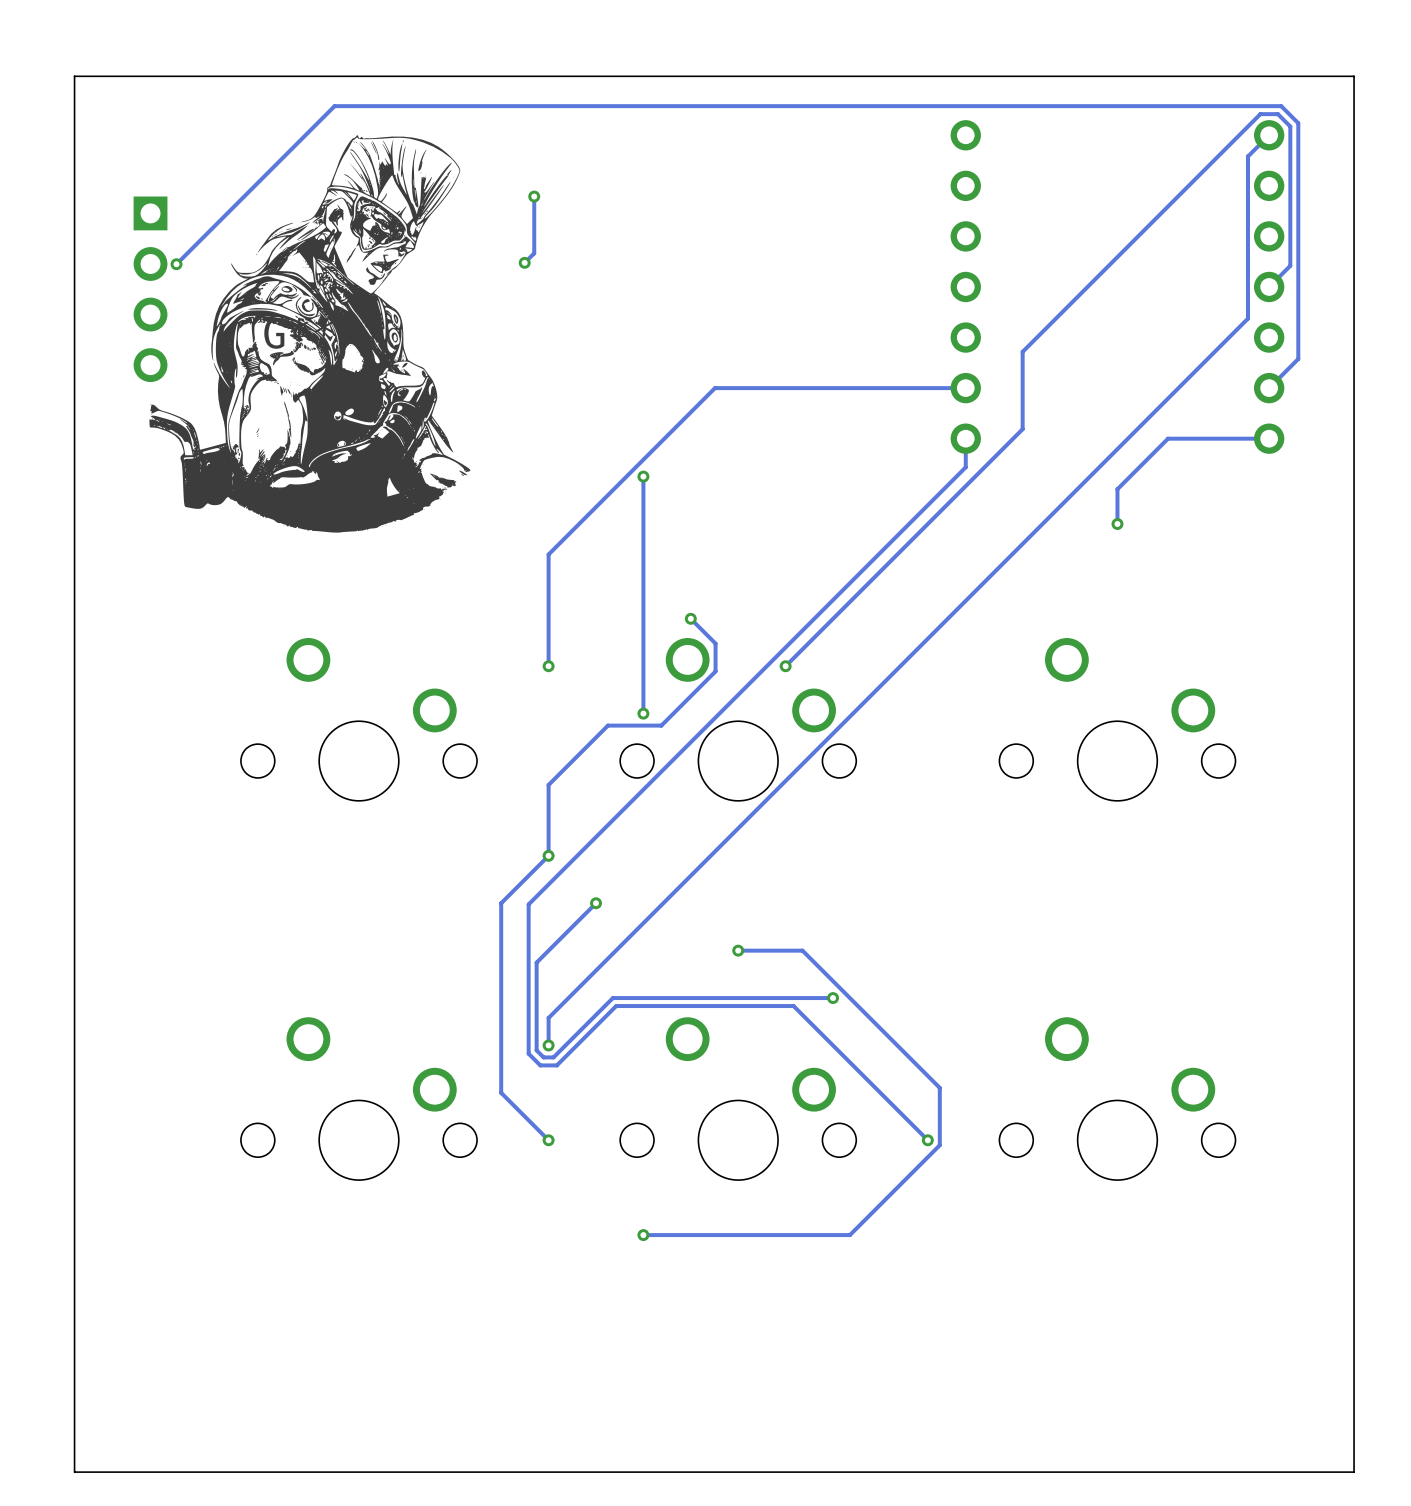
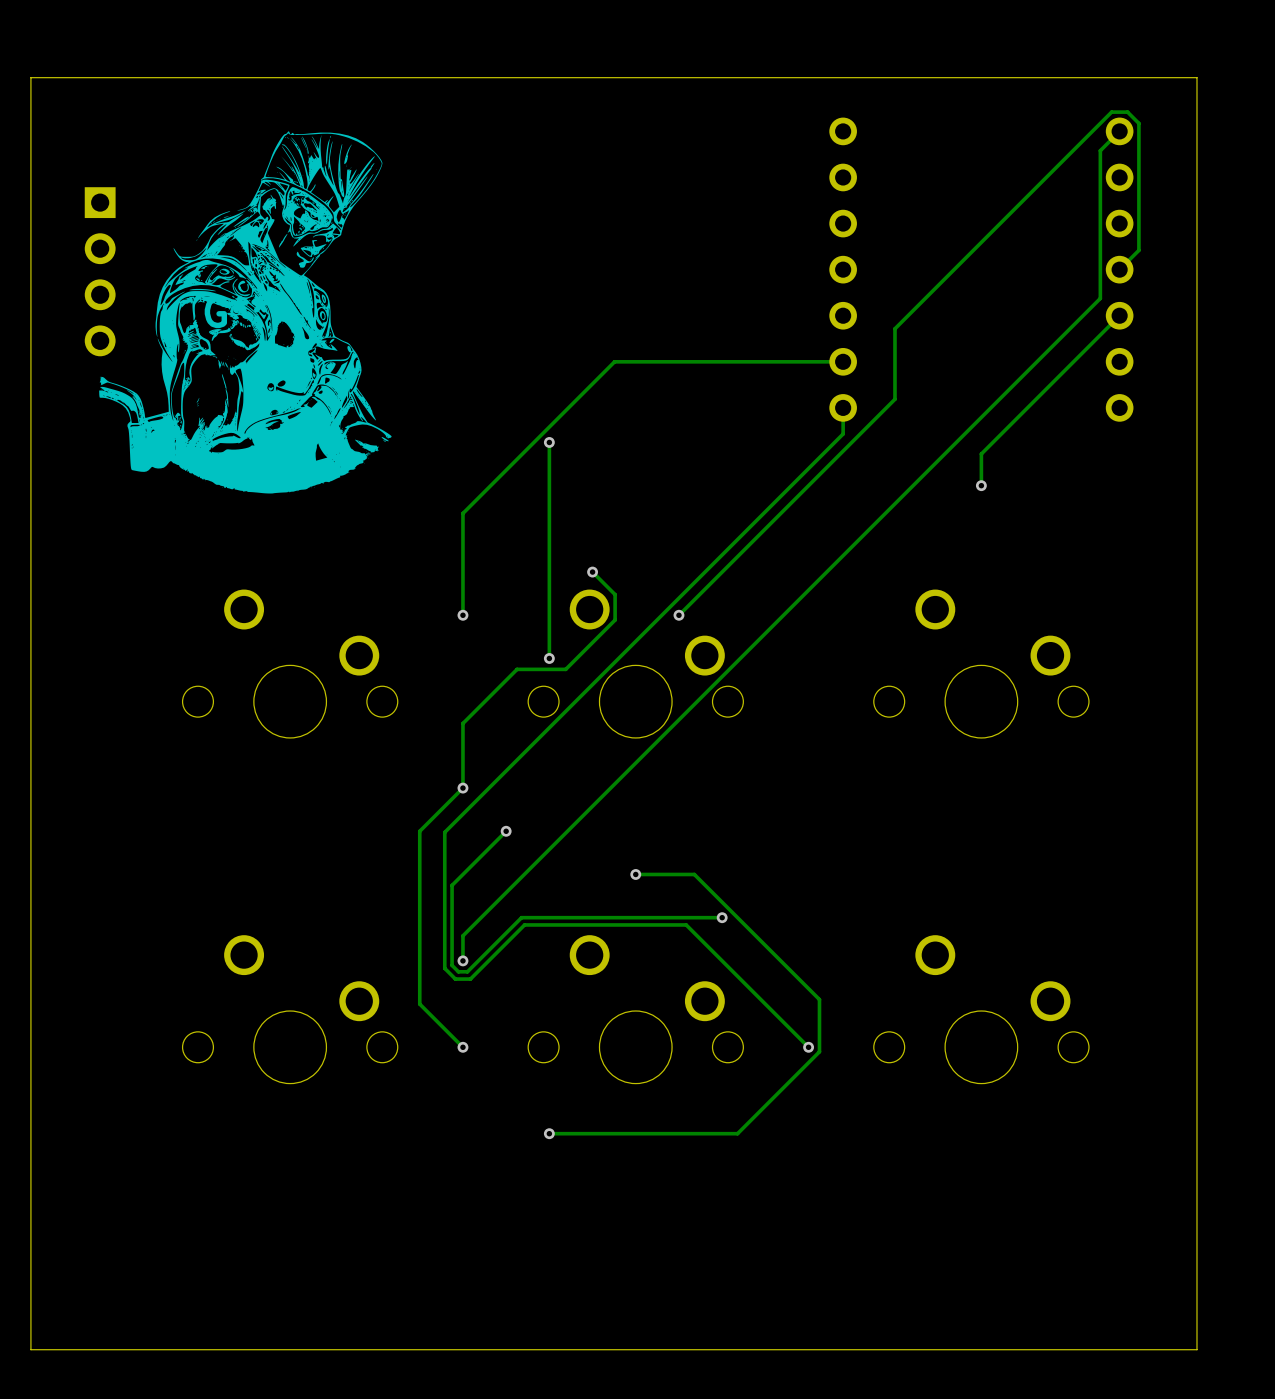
track: (534, 196) (534, 253) (524, 262) -> none
via: (534, 196) -> none
via: (524, 262) -> none
track: (176, 264) (334, 106) (1281, 106) (1298, 123) (1298, 358) (1269, 388) -> none
via: (176, 264) -> none
track: (1269, 438) (1168, 438) -> (1119, 315) (1027, 407)

